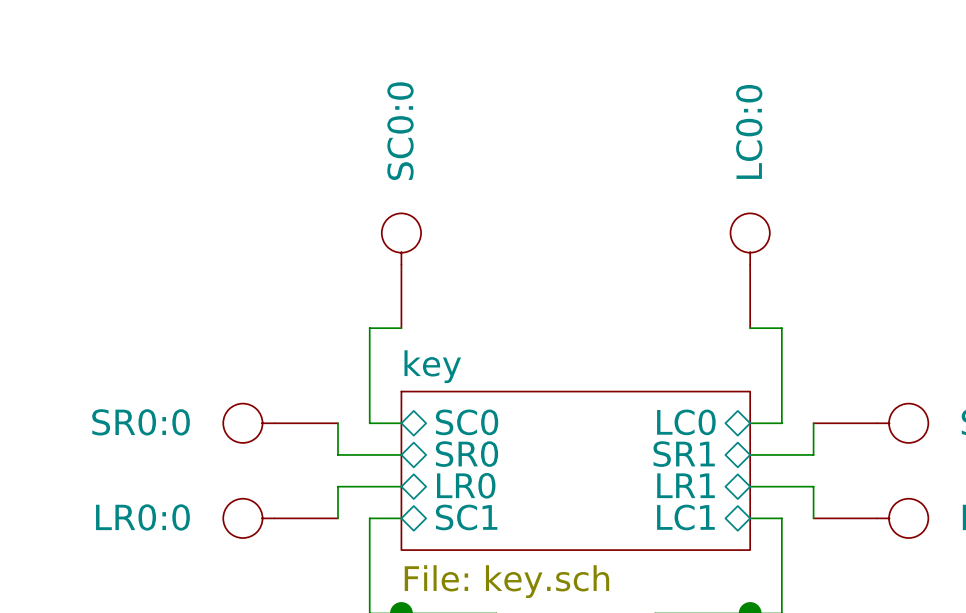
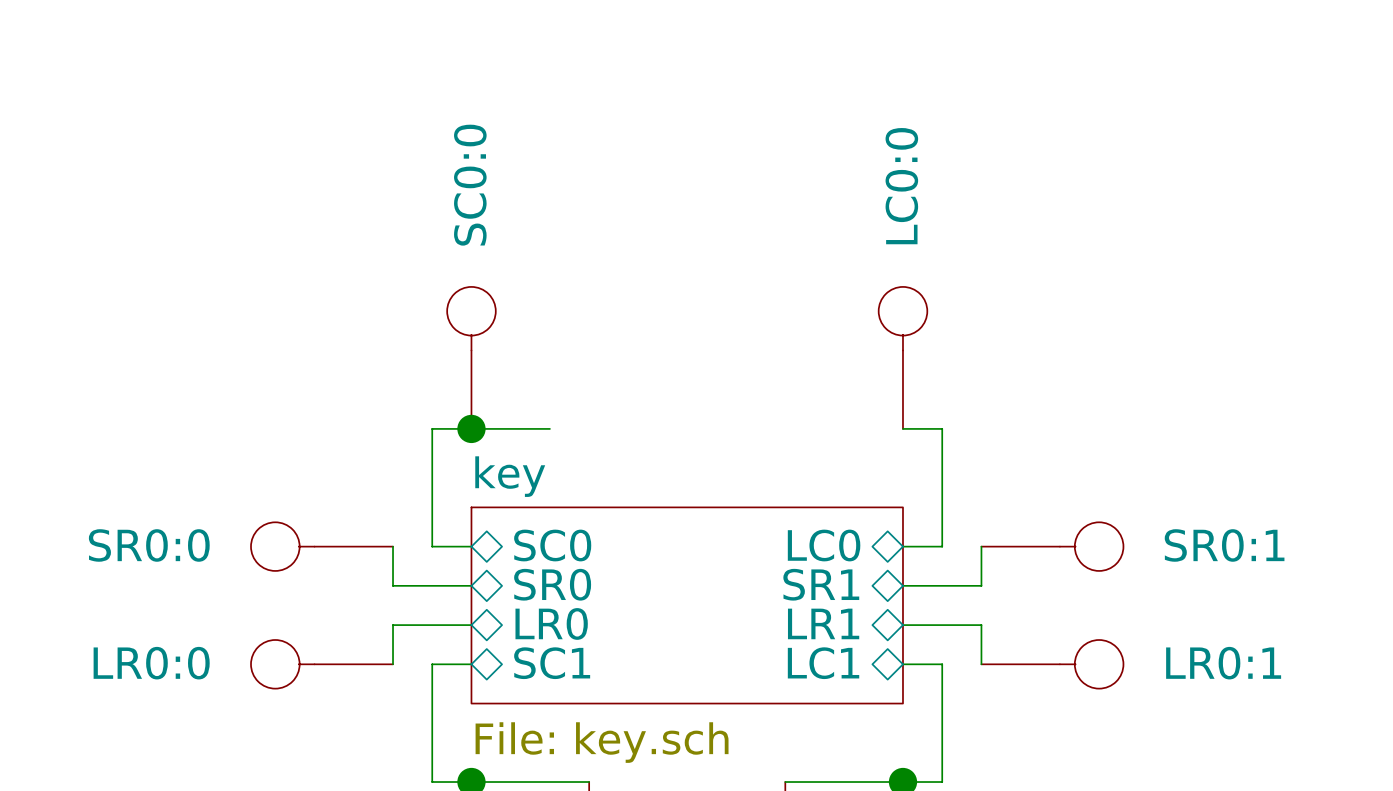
wire: none -> (471, 428) (549, 428)
junction: none -> (471, 428)

